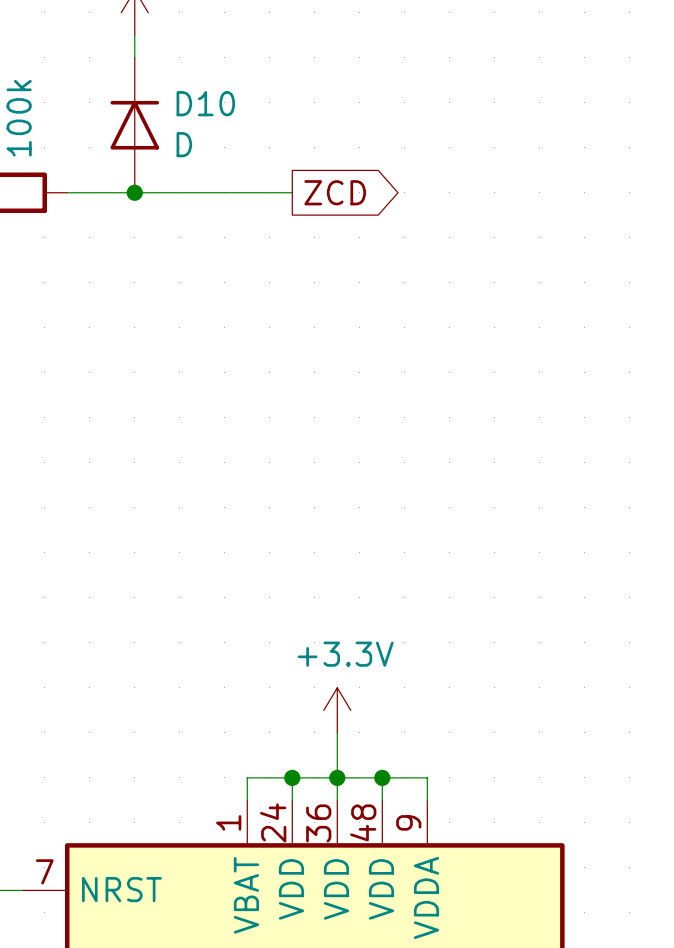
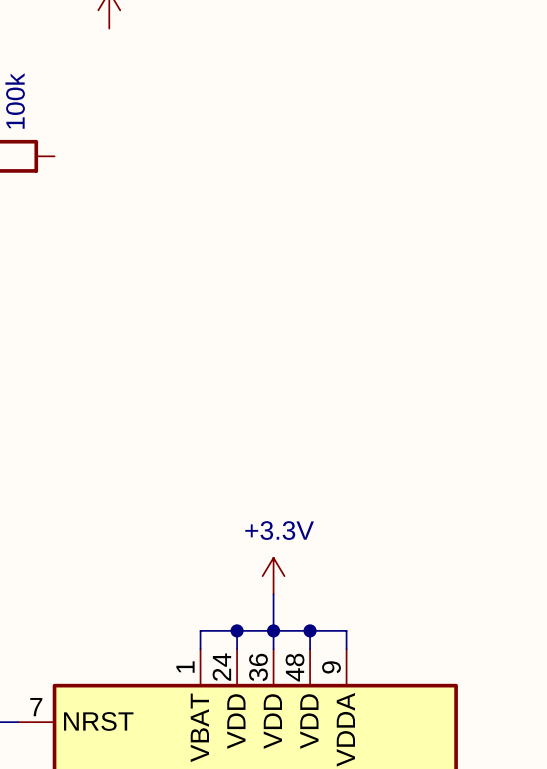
wire: (134, 35) (134, 57) -> none
D10: D (134, 125) -> none
wire: (67, 192) (292, 192) -> none
junction: (134, 192) -> none
global label: ZCD (335, 192) -> none

